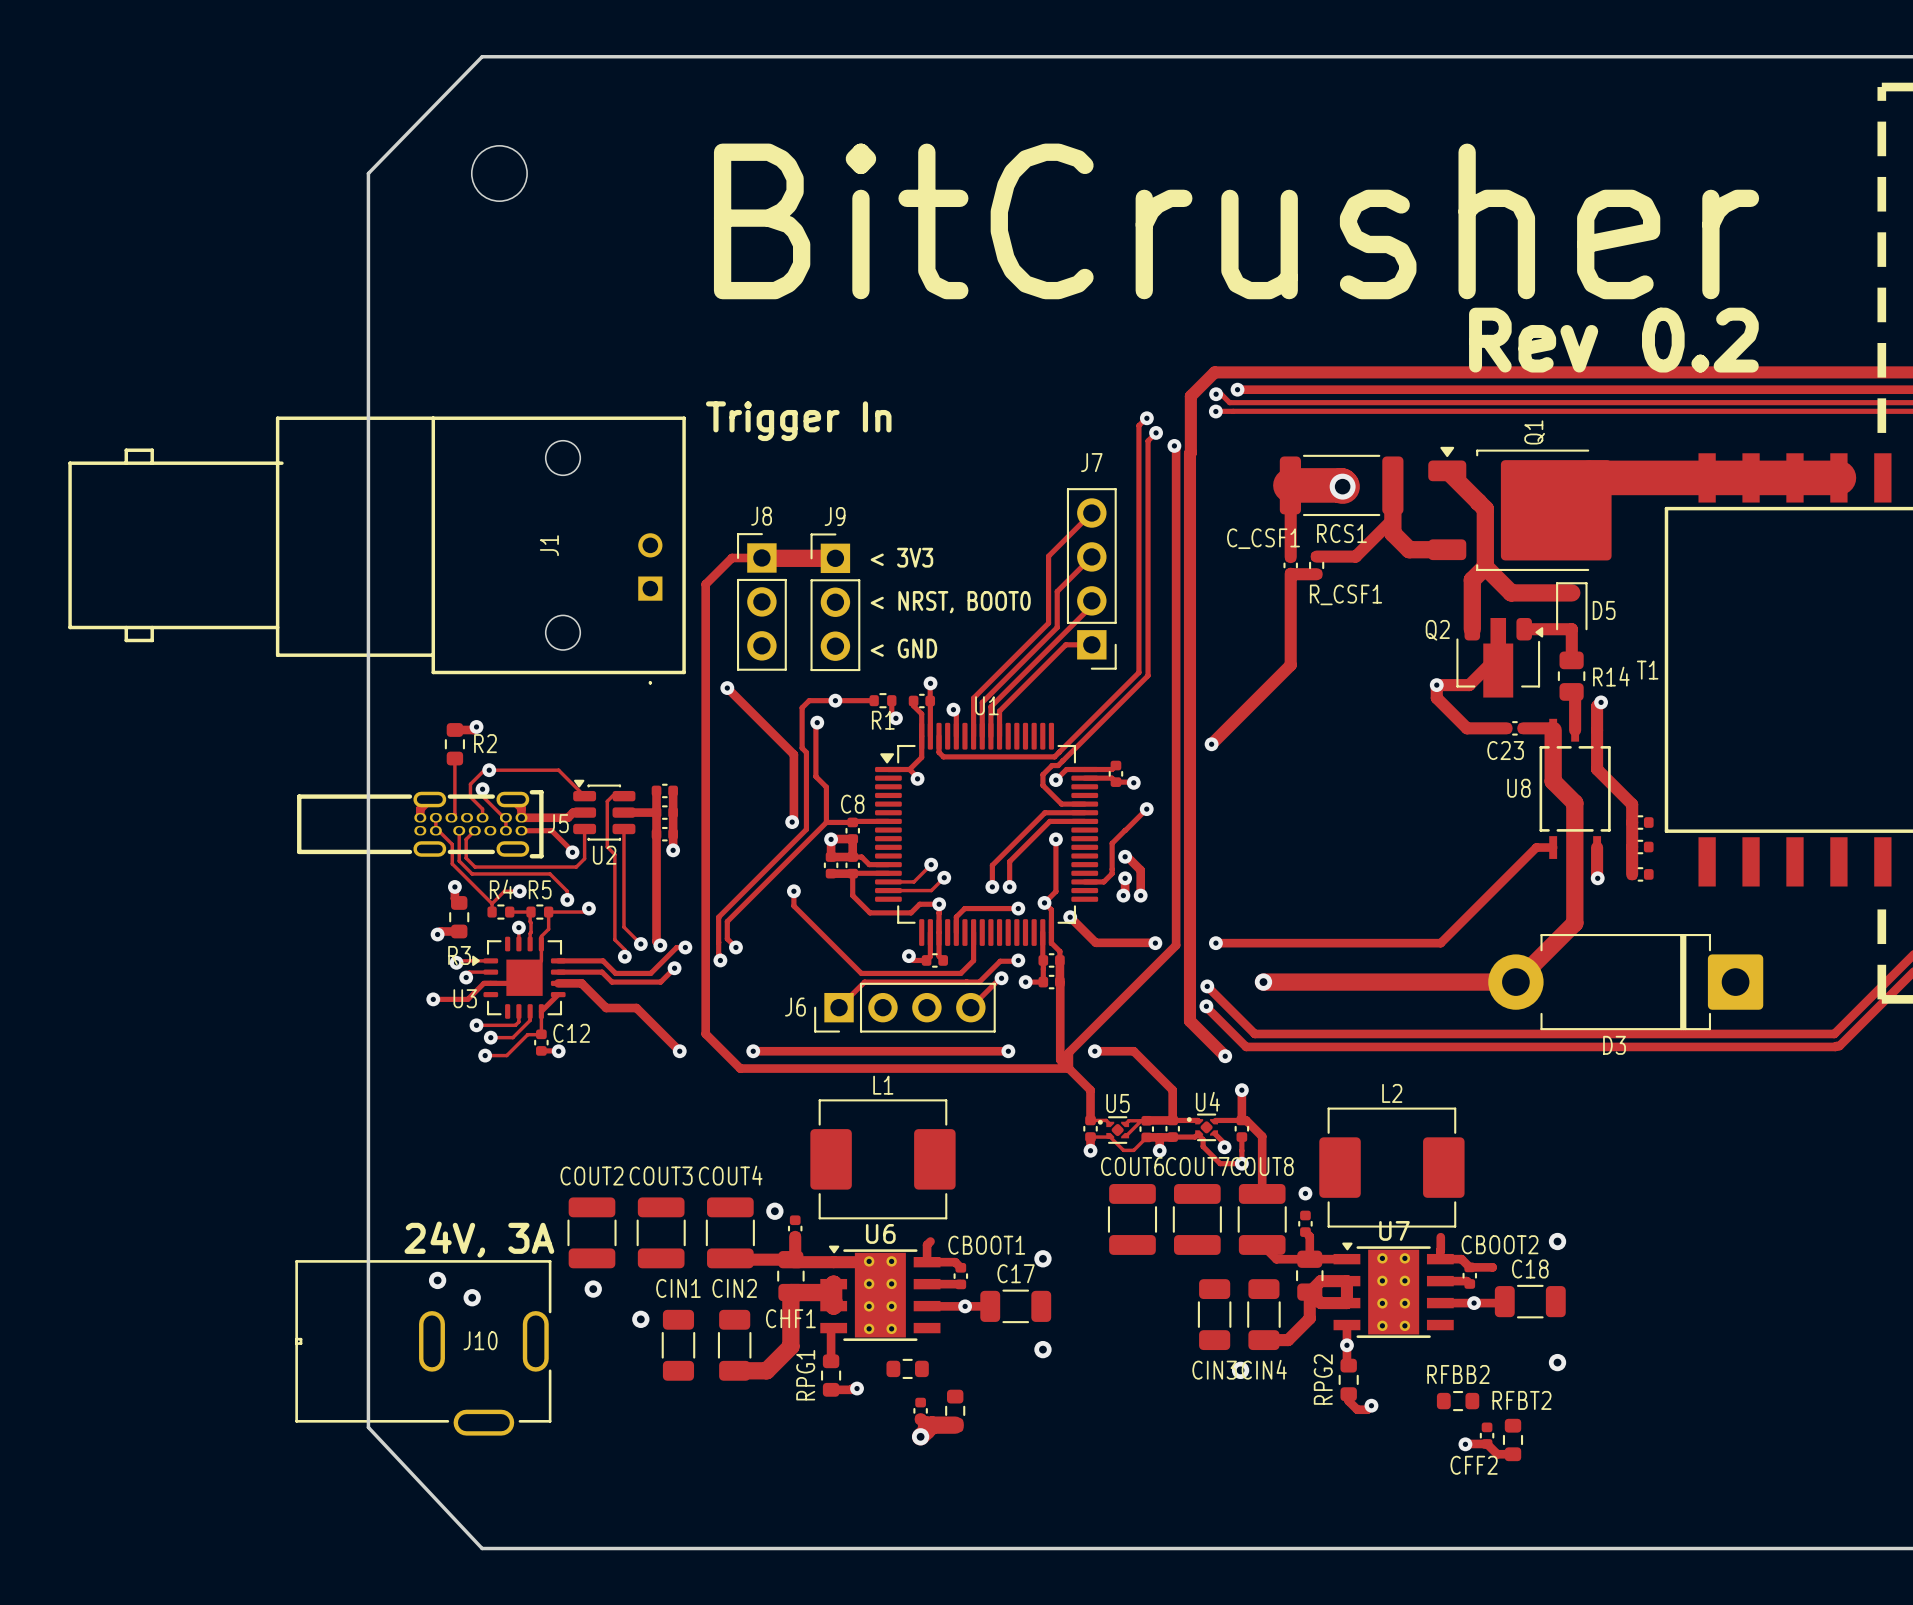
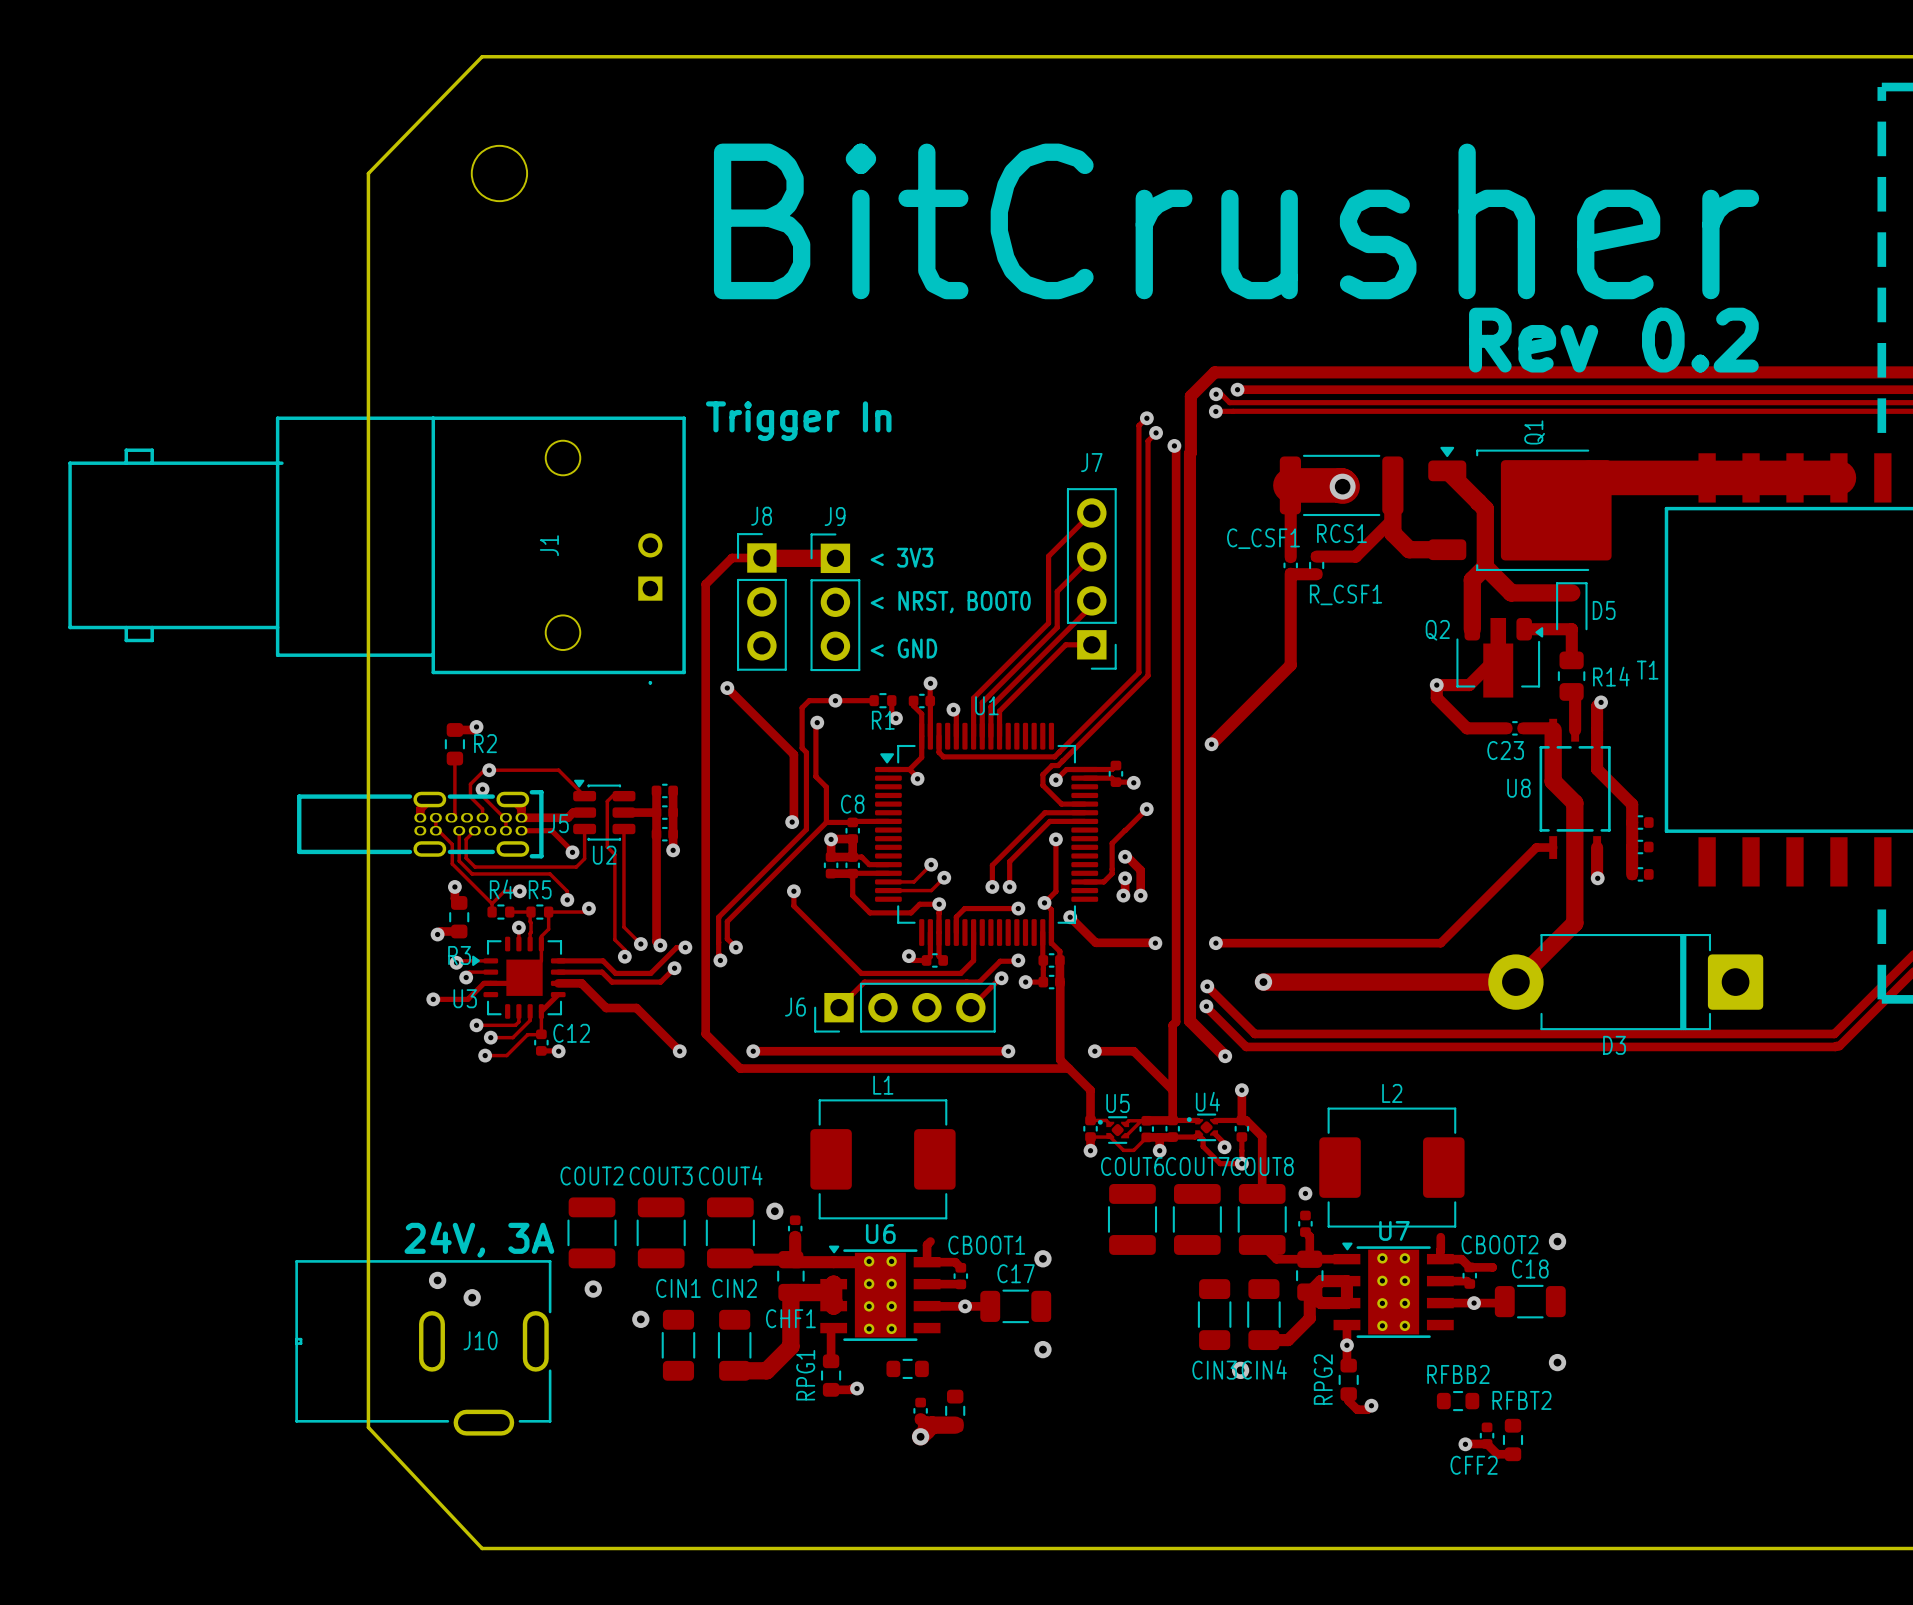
track: (1176, 945) (1068, 1052) (1068, 1068) -> (1176, 945) (1176, 1021) (1172, 1025) (1172, 1090)

